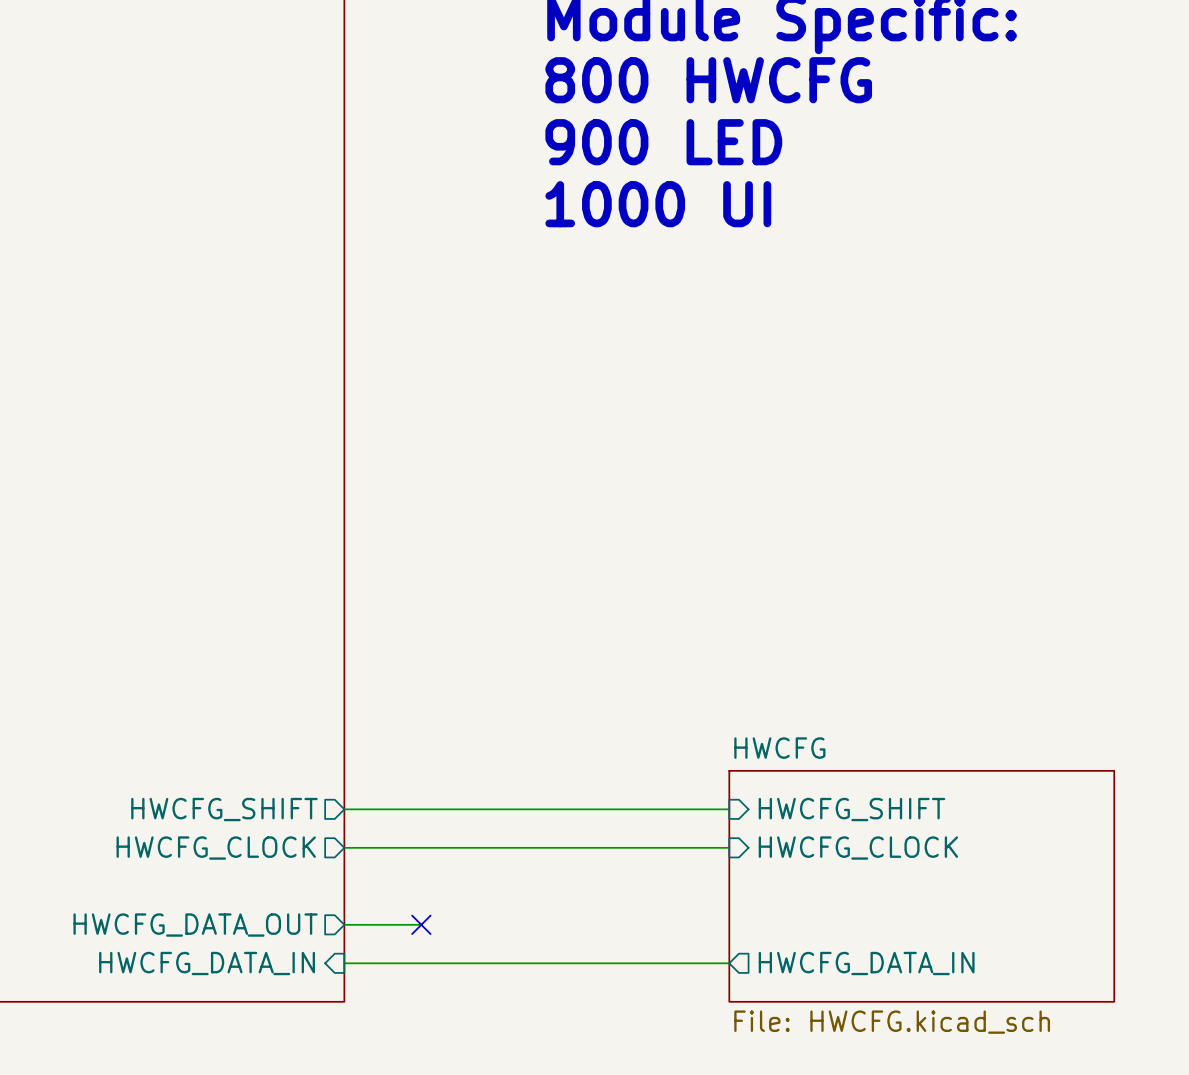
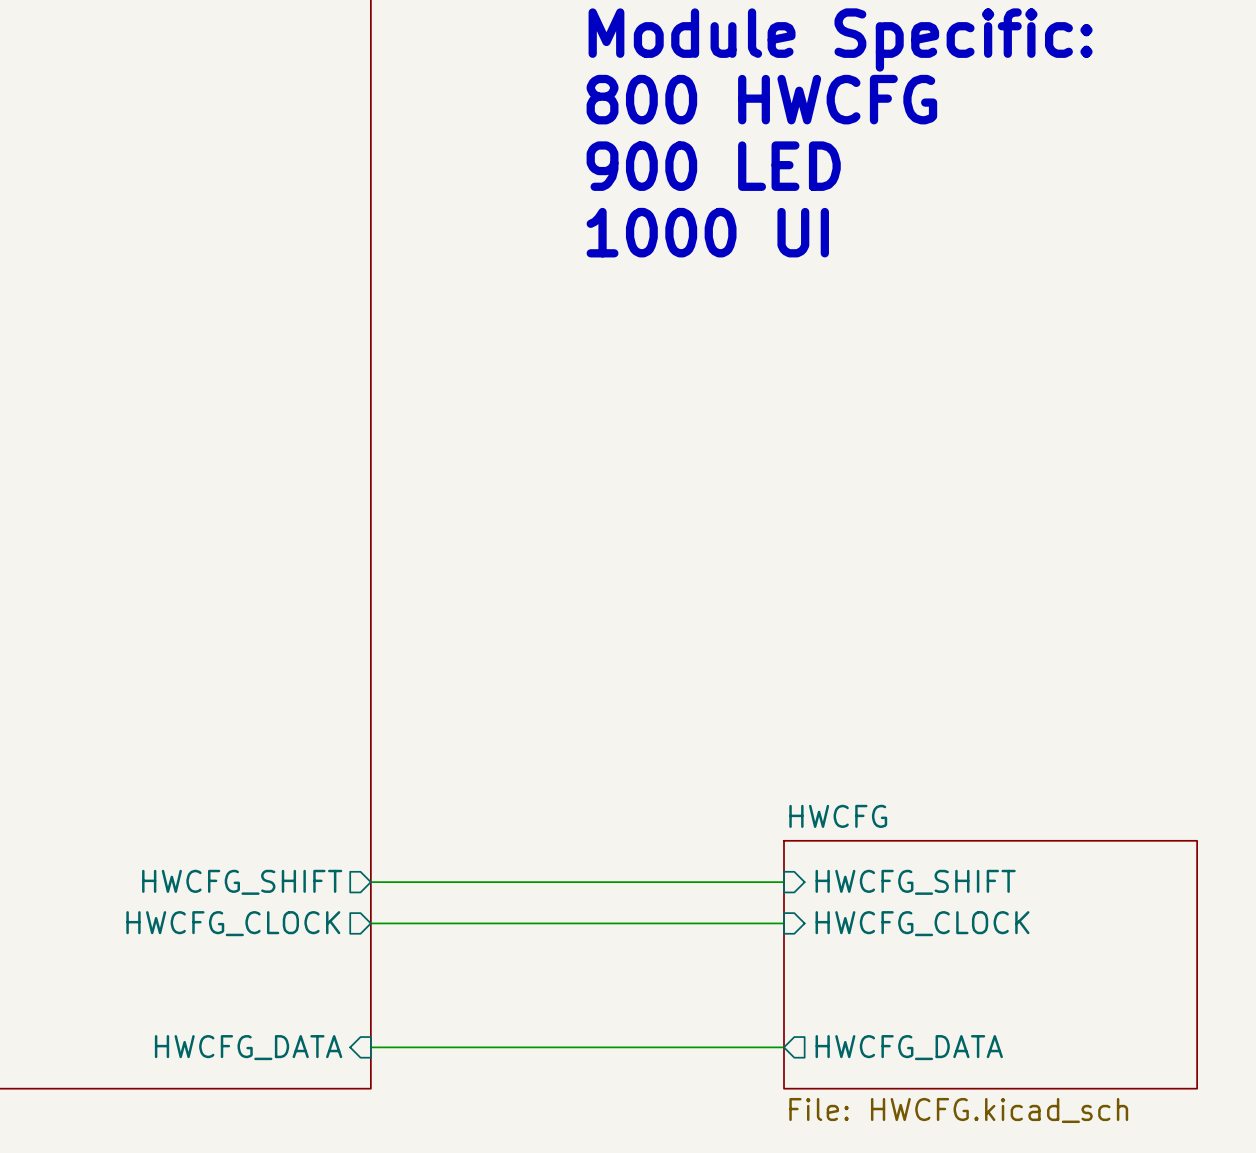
wire: (344, 924) (421, 924) -> none
no-connect mark: (421, 924) -> none
sheet pin: HWCFG_DATA_OUT (195, 925) -> none
sheet pin: HWCFG_DATA_IN (207, 963) -> HWCFG_DATA (248, 1047)
sheet pin: HWCFG_DATA_IN (866, 963) -> HWCFG_DATA (909, 1047)

